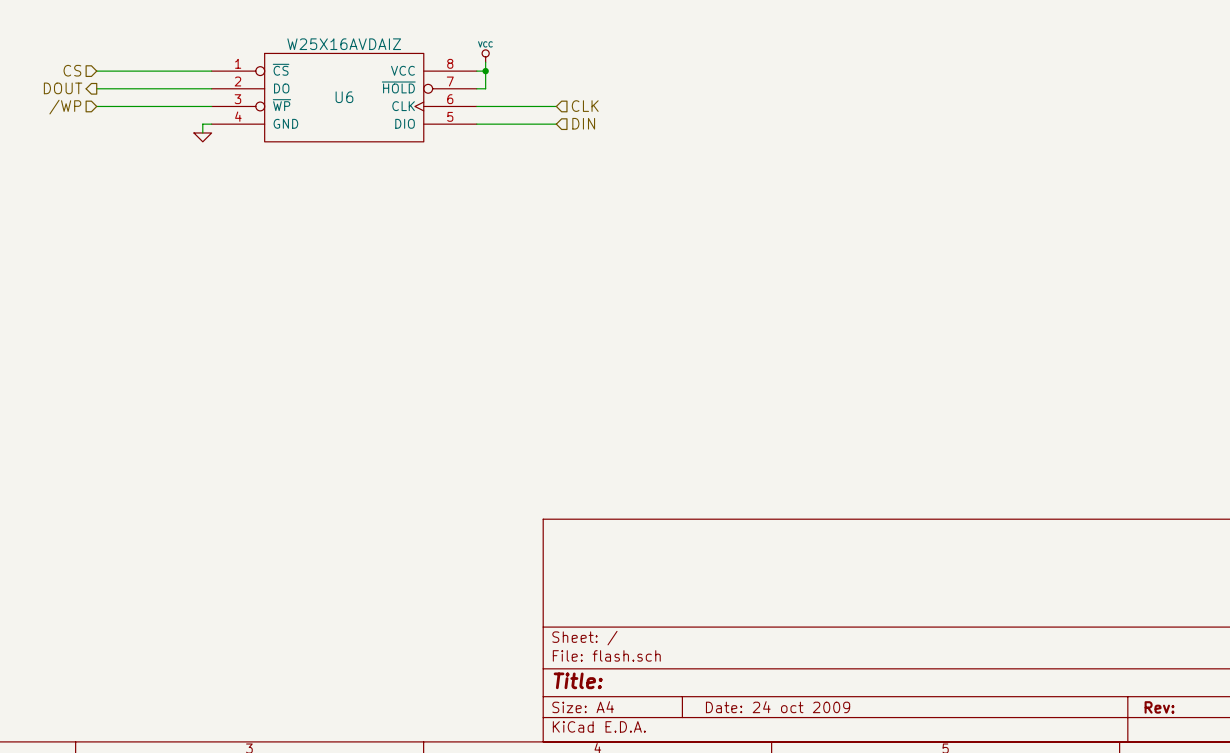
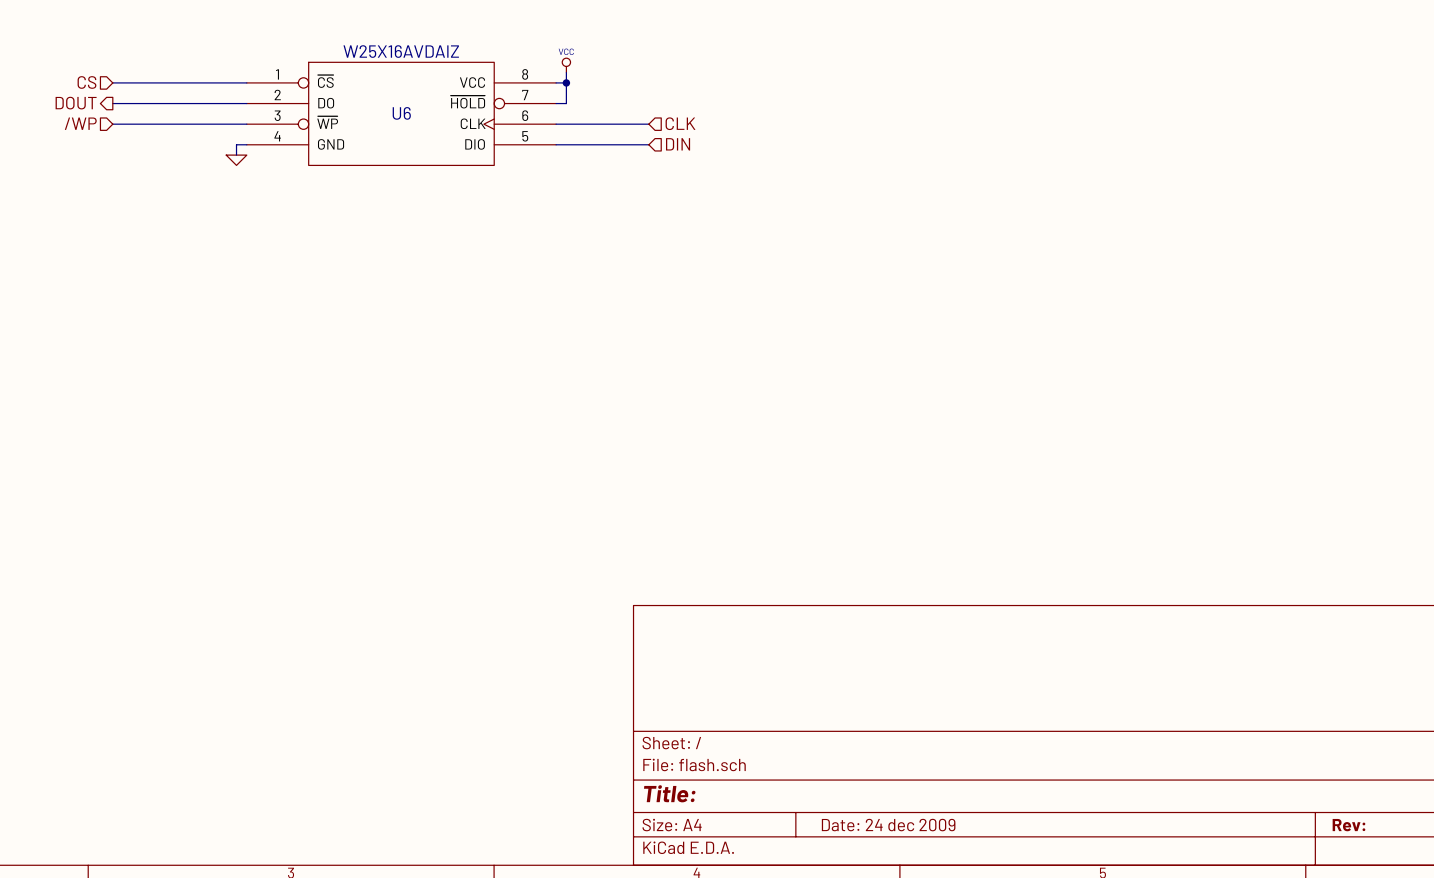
title block: Date: 24 oct 2009 (778, 707) -> Date: 24 dec 2009 (888, 825)

